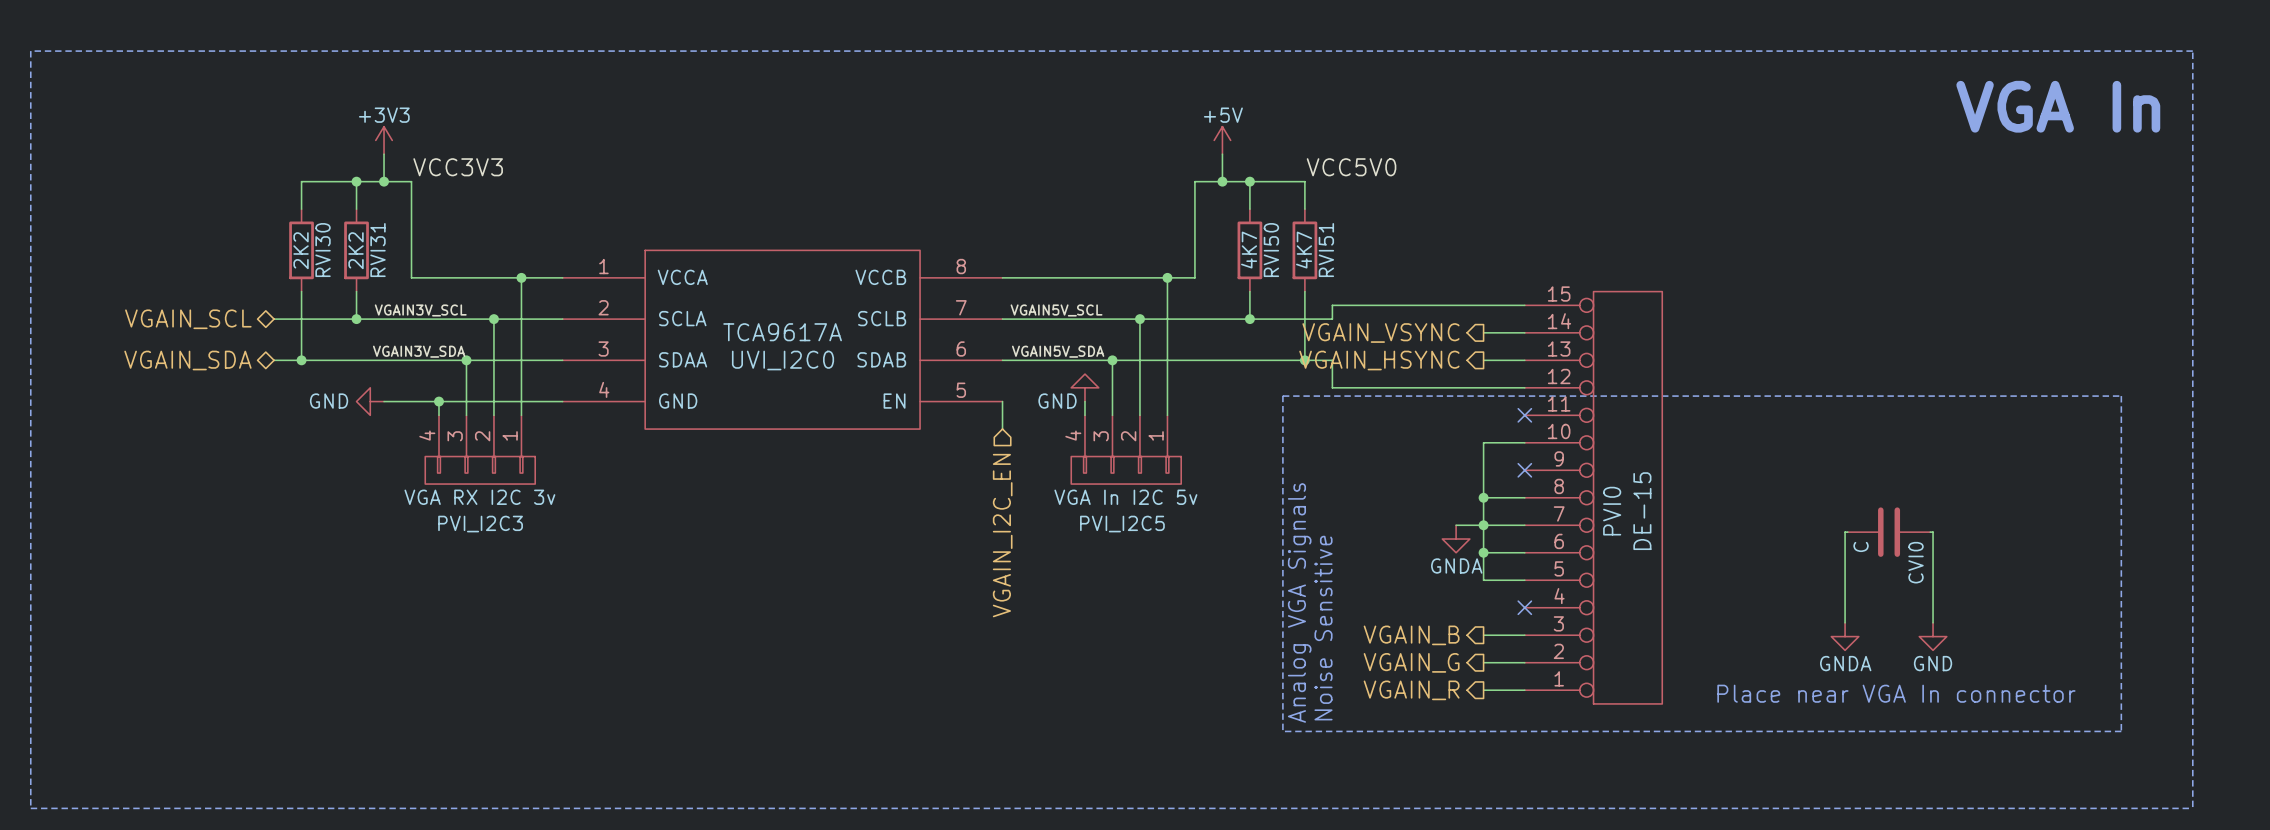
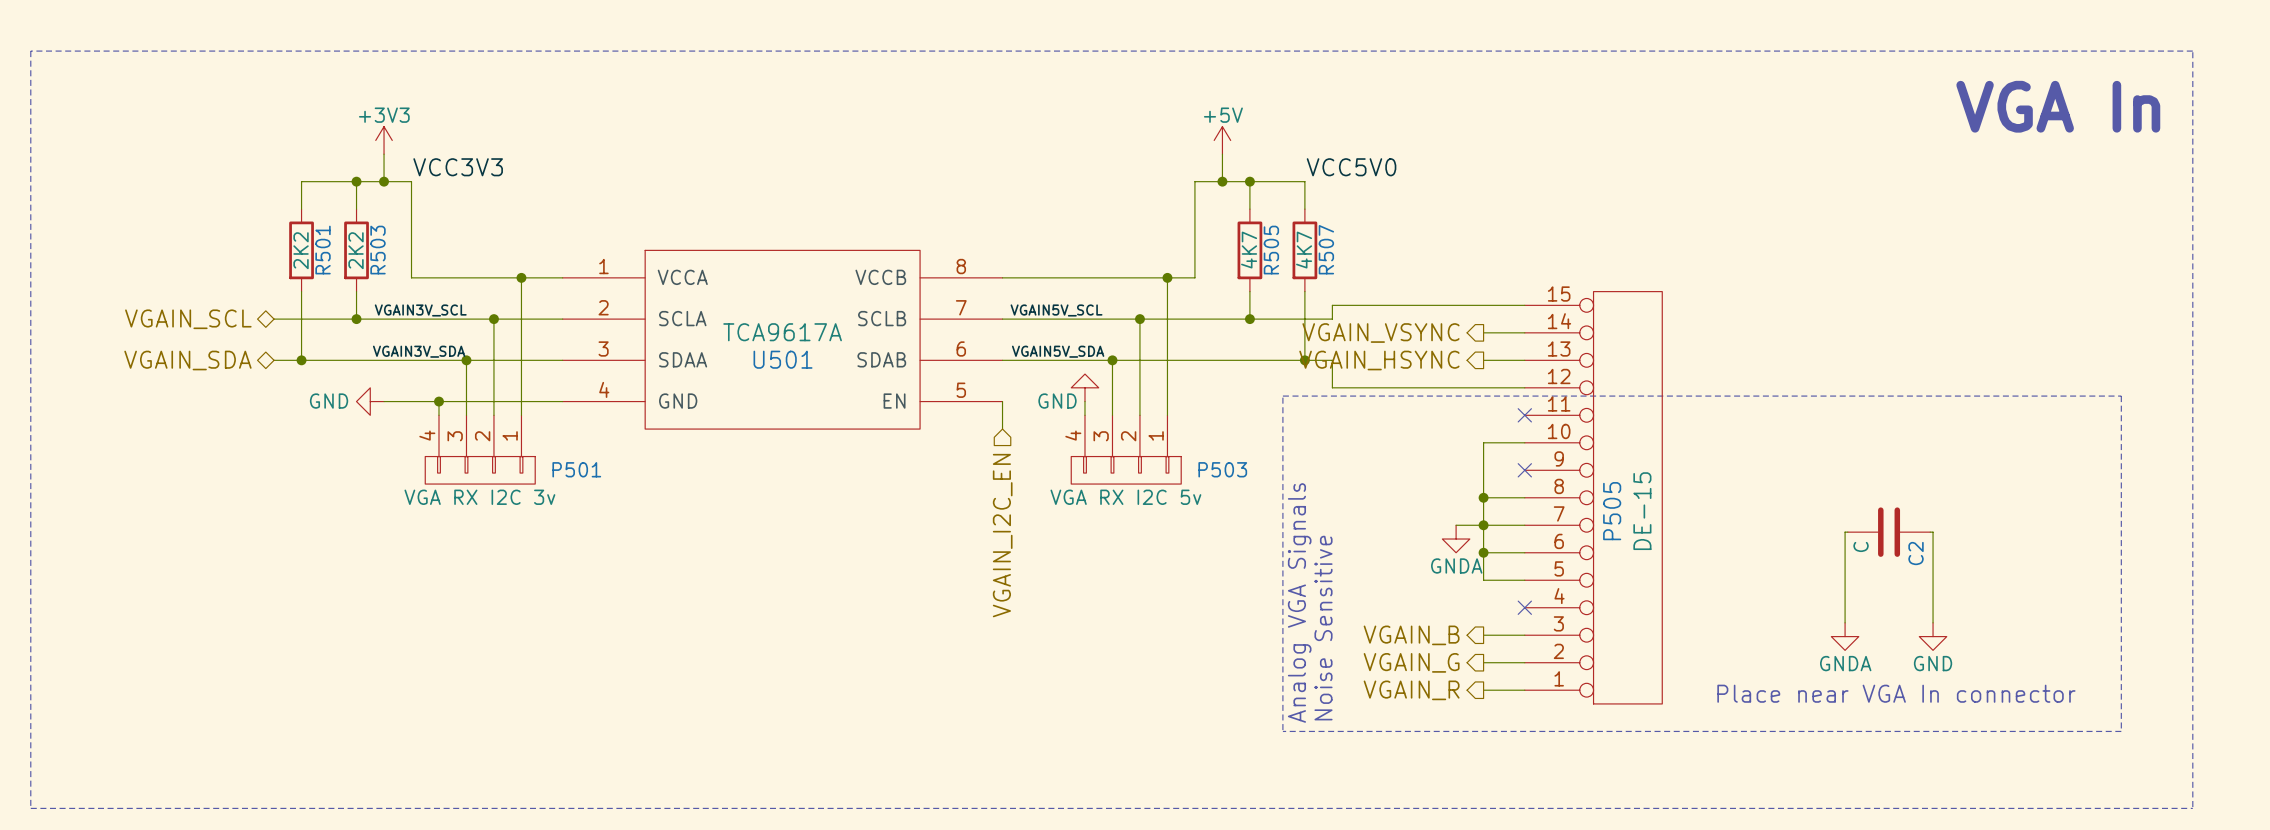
RVI30 name: RVI30 (323, 250) -> R501 (323, 250)
RVI31 name: RVI31 (378, 250) -> R503 (378, 250)
RVI50 name: RVI50 (1271, 250) -> R505 (1271, 250)
RVI51 name: RVI51 (1326, 250) -> R507 (1326, 249)
UVI_I2C0 name: UVI_I2C0 (783, 360) -> U501 (783, 359)
PVI_I2C5 value: VGA In I2C 5v (1125, 497) -> VGA RX I2C 5v (1125, 497)
PVI0 name: PVI0 (1612, 511) -> P505 (1612, 511)
PVI_I2C3 name: PVI_I2C3 (480, 524) -> P501 (576, 469)
PVI_I2C5 name: PVI_I2C5 (1122, 524) -> P503 (1222, 469)
CVI0 name: CVI0 (1916, 562) -> C2 (1916, 553)

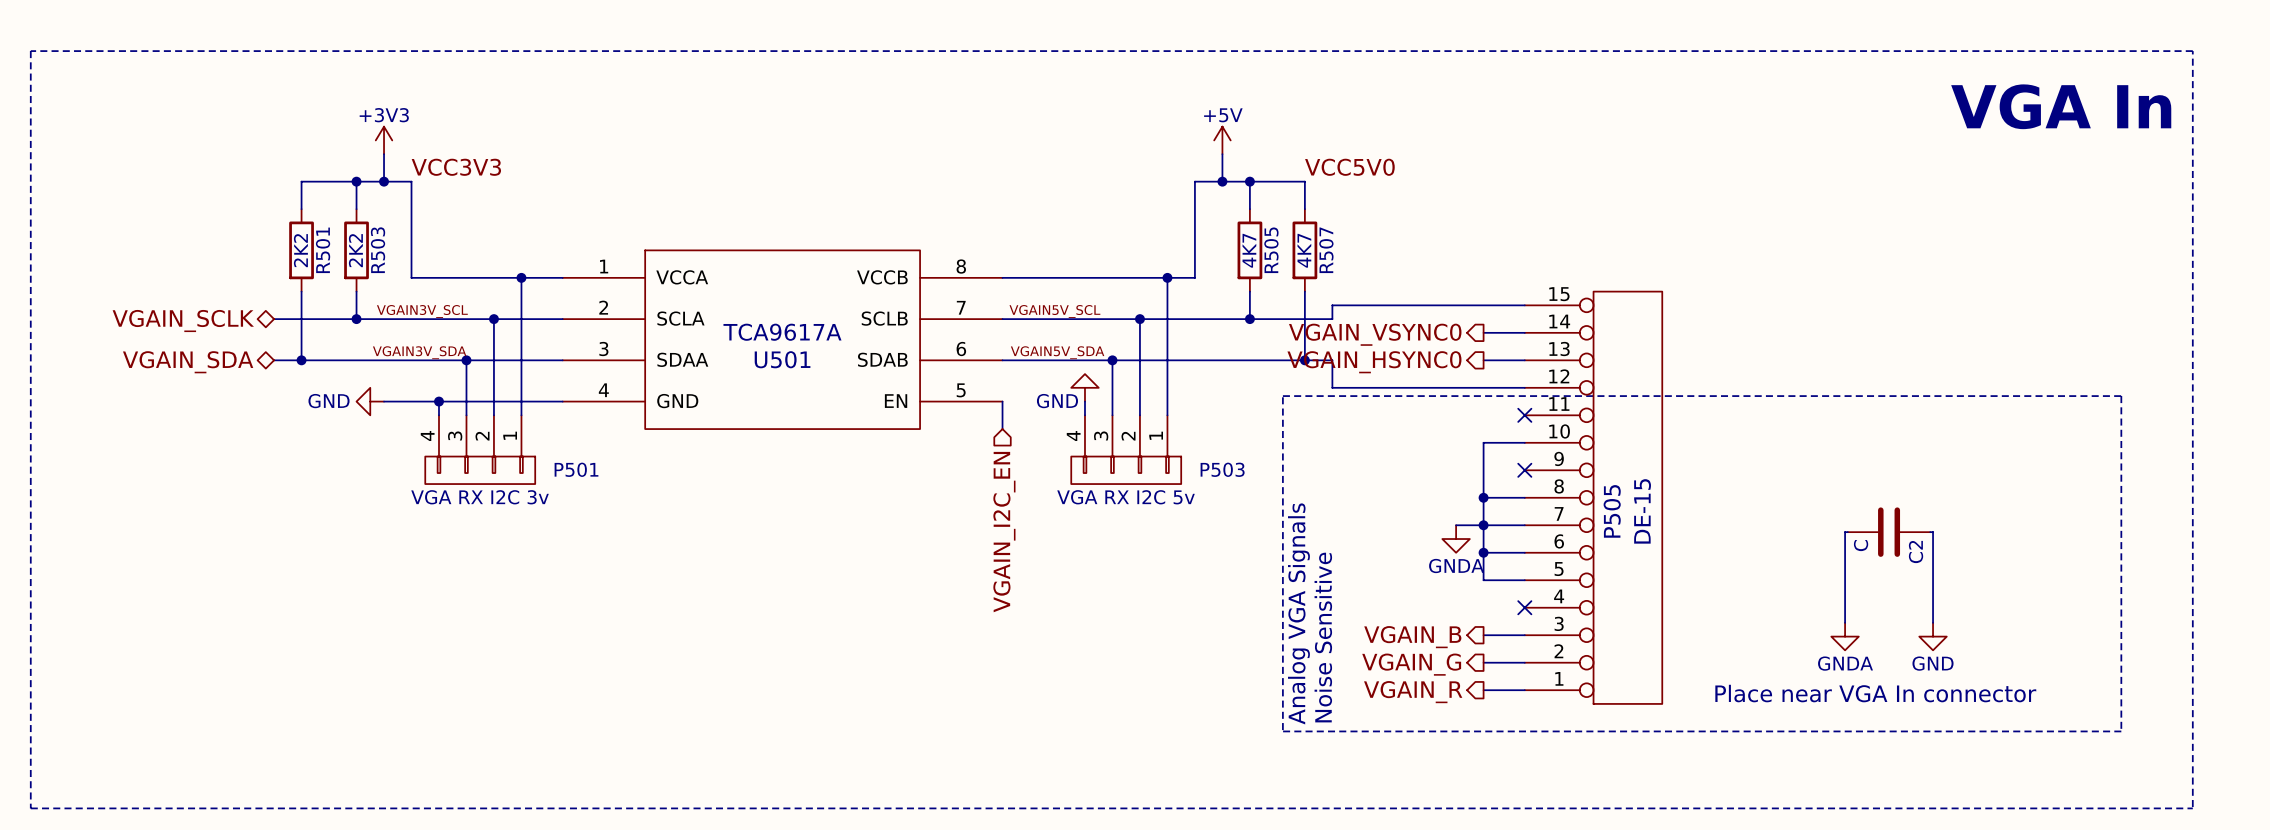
hierarchical label: VGAIN_SCL (188, 319) -> VGAIN_SCLK (183, 321)
hierarchical label: VGAIN_VSYNC (1380, 333) -> VGAIN_VSYNC0 (1375, 334)
hierarchical label: VGAIN_HSYNC (1379, 360) -> VGAIN_HSYNC0 (1374, 362)

